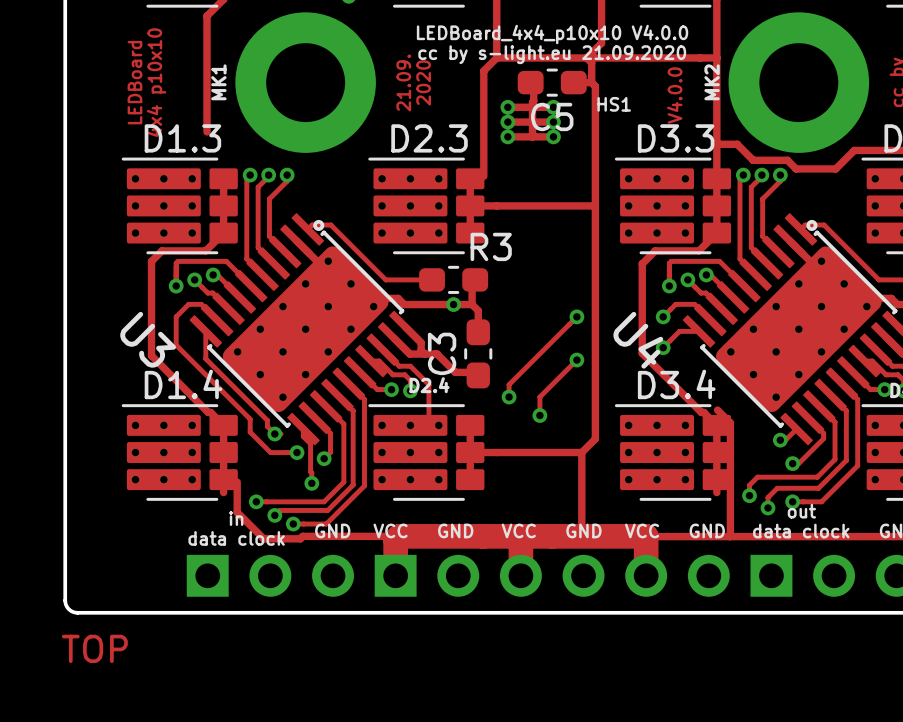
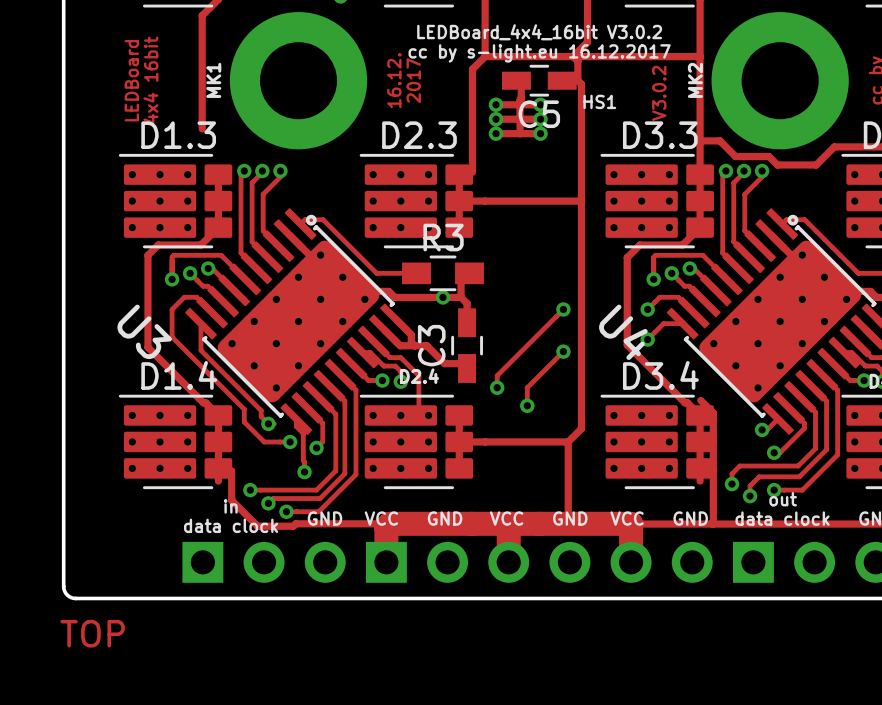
text: LEDBoard_4x4_p10x10 V4.0.0 (552, 34) -> LEDBoard_4x4_16bit V3.0.2 (539, 32)
text: cc by s-light.eu 21.09.2020 (552, 54) -> cc by s-light.eu 16.12.2017 (539, 53)
C5 footprint: [517, 68, 587, 97] -> [502, 64, 577, 97]
text: 4x4 p10x10 (156, 82) -> 4x4 16bit (150, 80)
text: 21.09. (403, 82) -> 16.12. (394, 80)
text: 2020 (423, 82) -> 2017 (413, 80)
text: V4.0.0 (674, 95) -> V3.0.2 (659, 93)
R3 name position: R3 (491, 246) -> R3 (443, 237)
R3 footprint: [419, 265, 489, 294] -> [402, 255, 484, 292]
C3 footprint: [464, 319, 493, 389] -> [451, 308, 483, 383]

